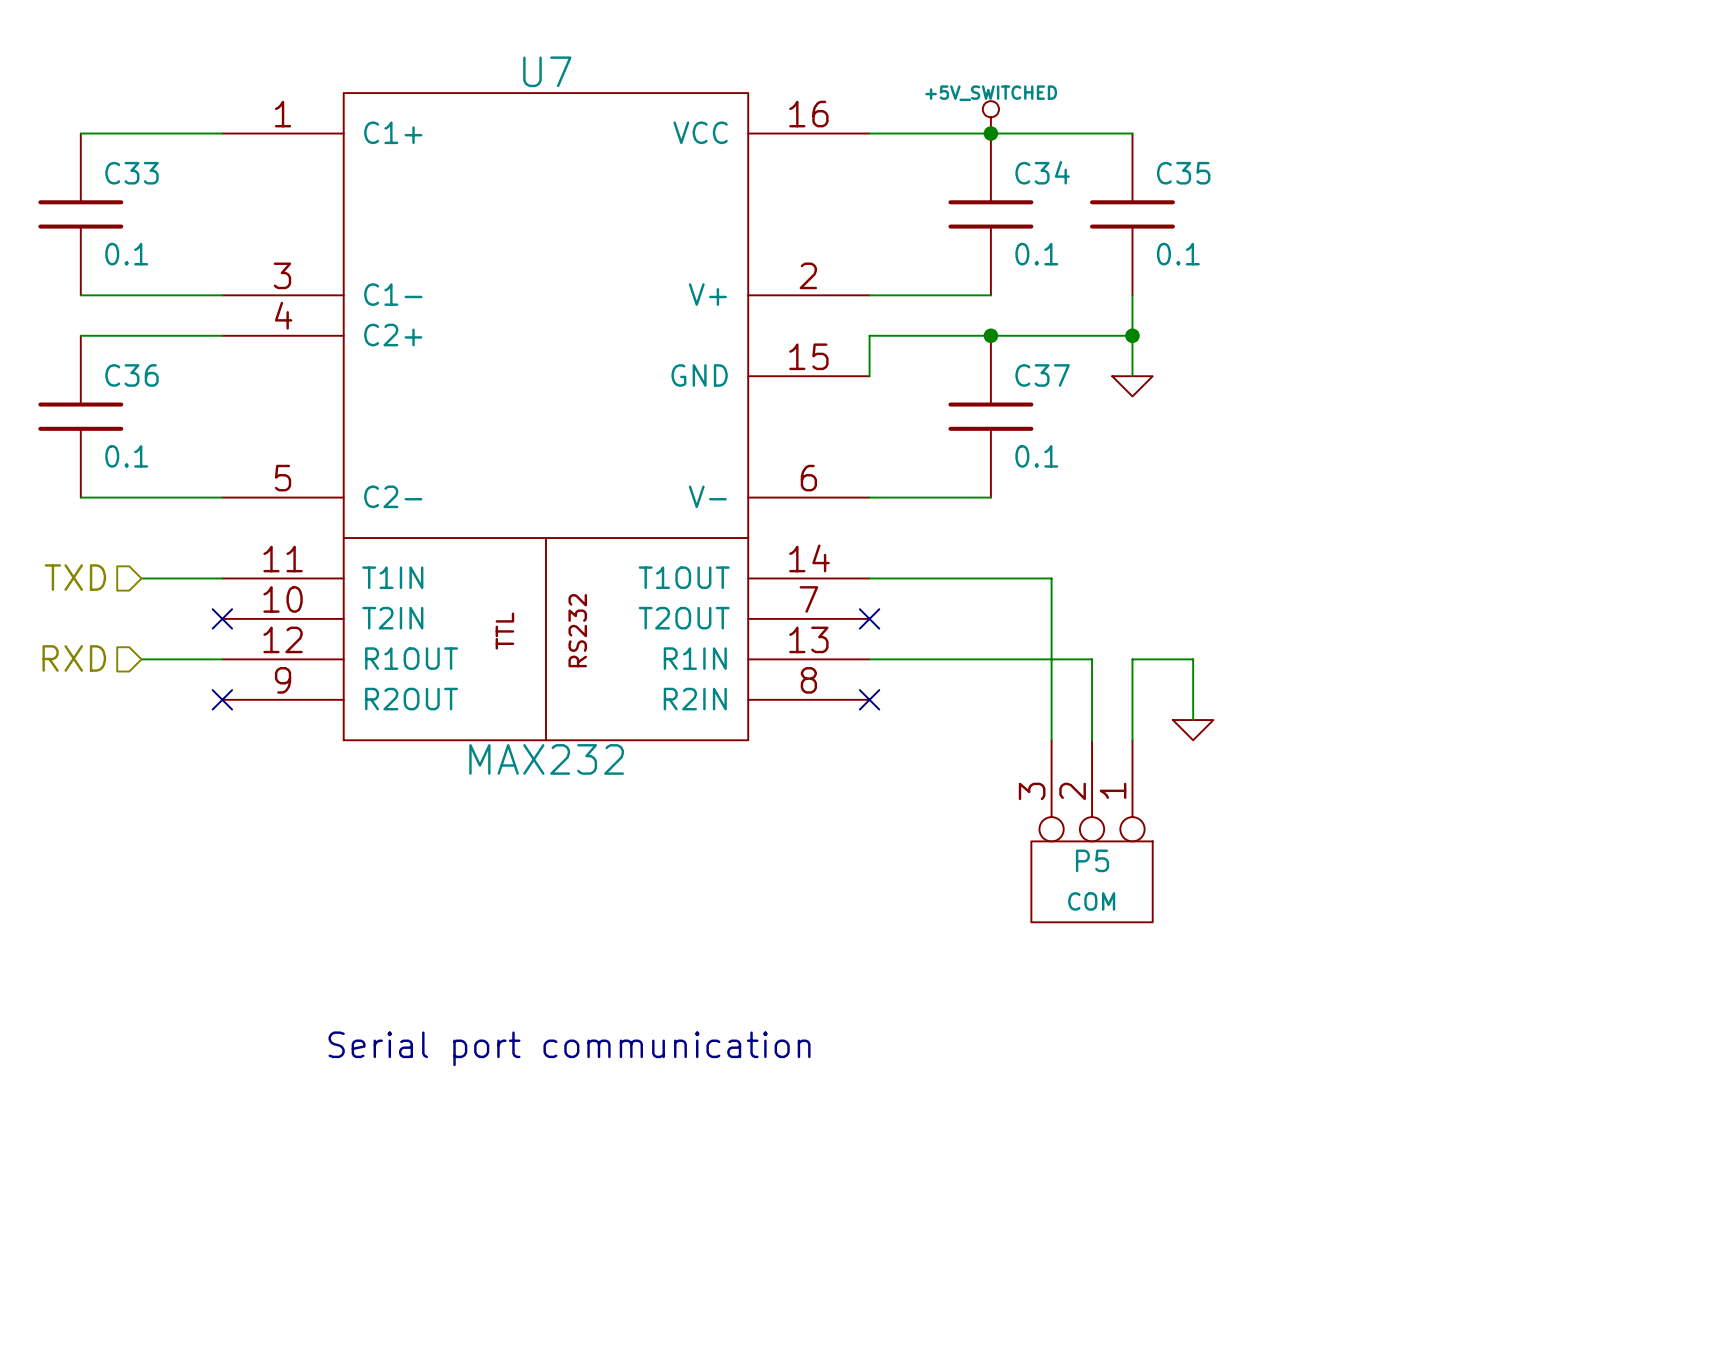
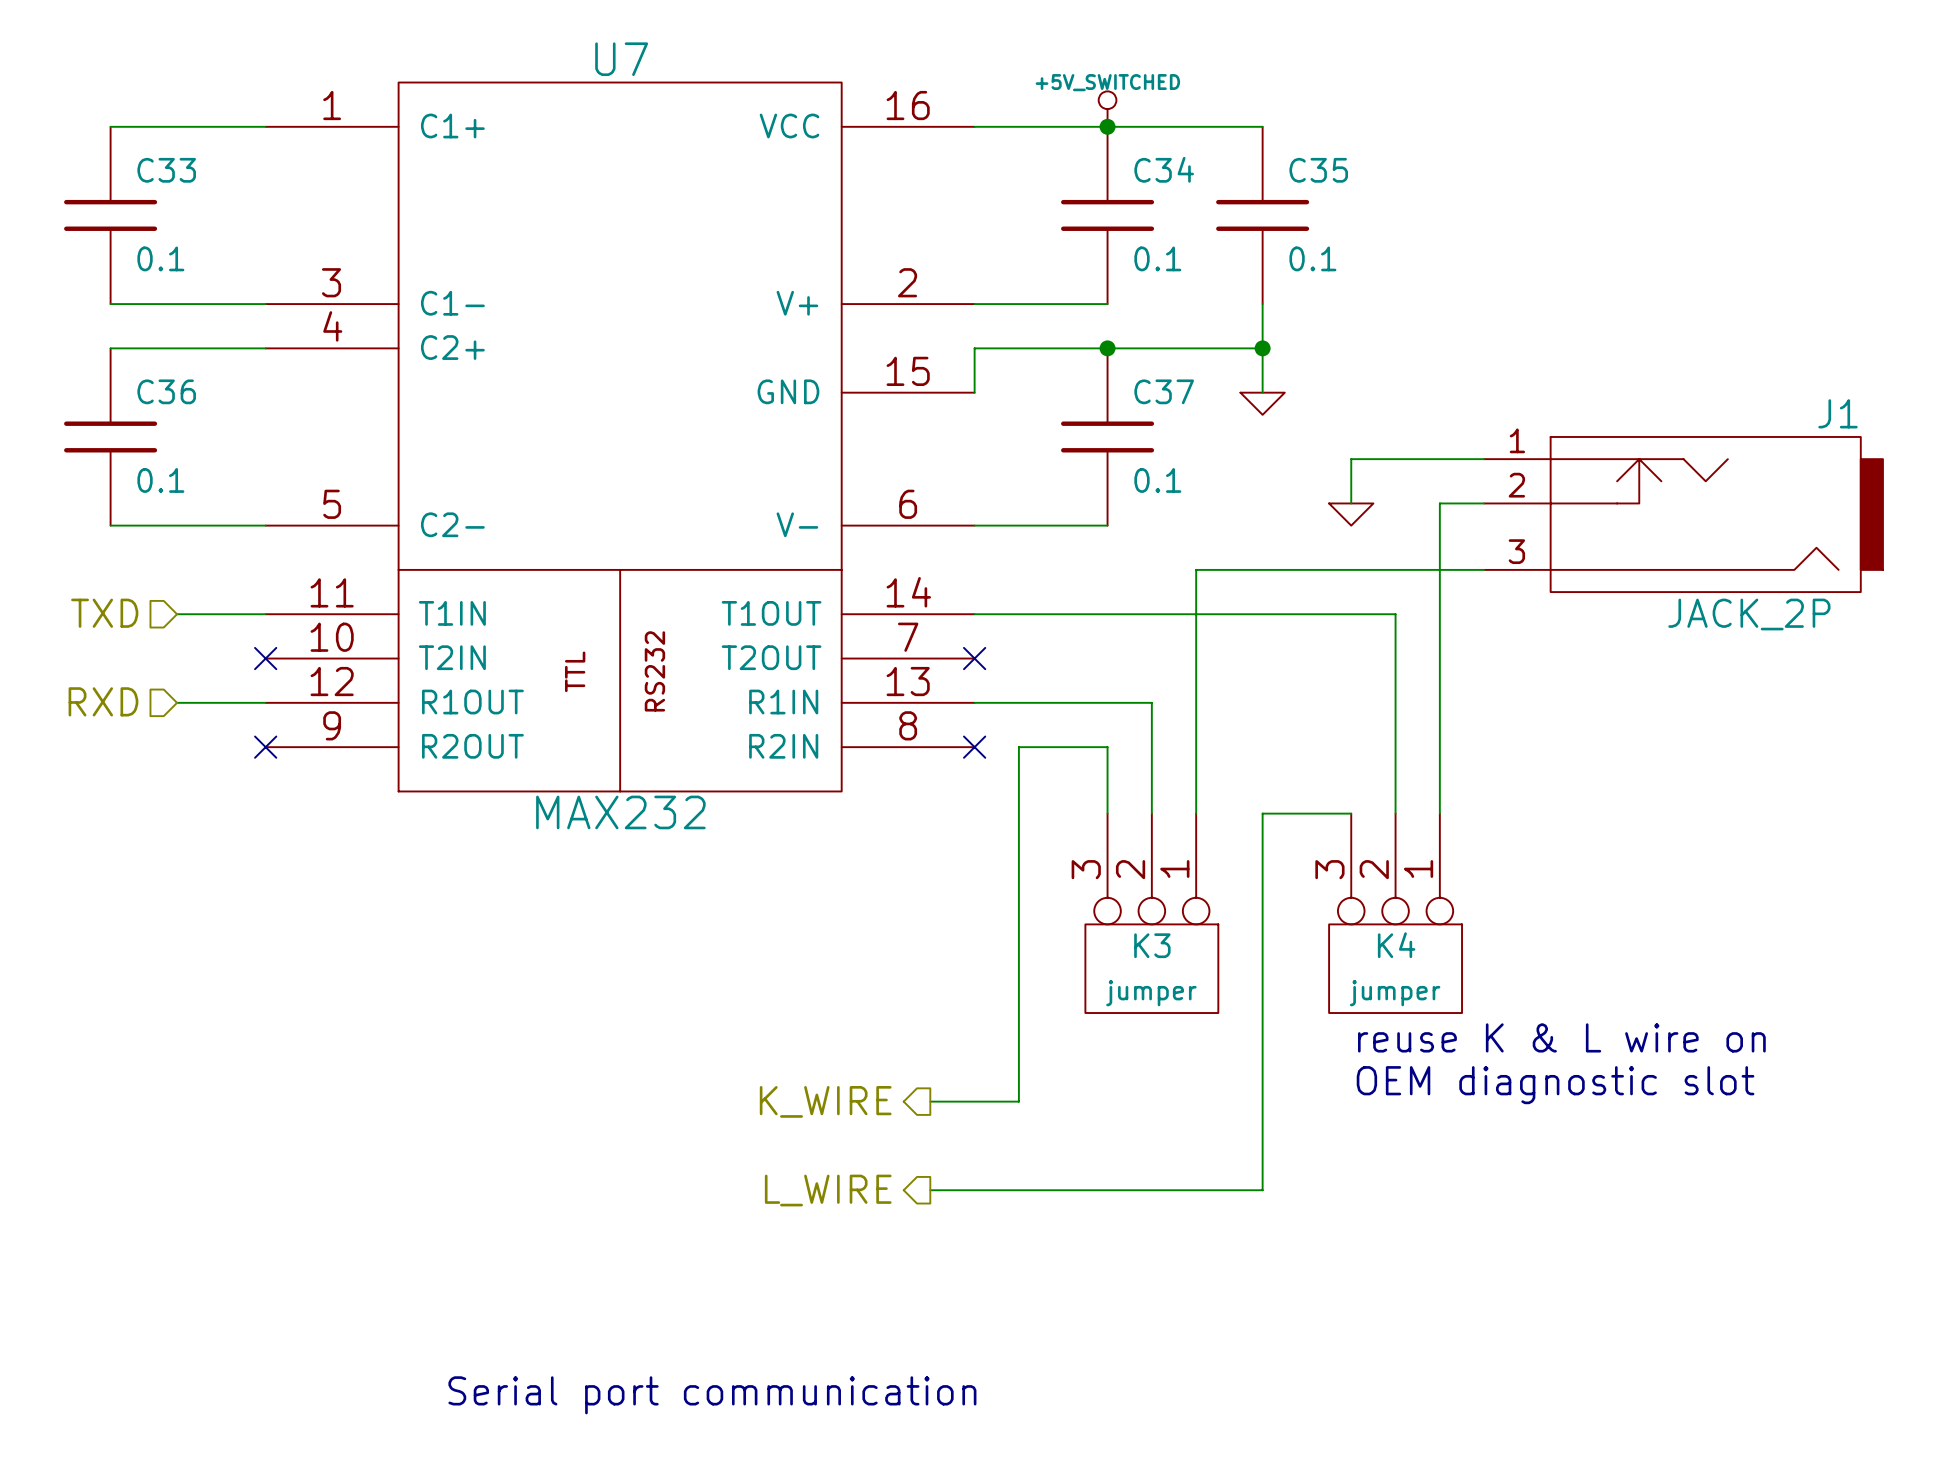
wire: none -> (1484, 459) (1351, 459) (1351, 503)
wire: none -> (1484, 503) (1439, 503) (1439, 813)
J1: none -> JACK_2P (1683, 514)
wire: none -> (1484, 569) (1196, 569) (1196, 813)
wire: (1051, 578) (1051, 740) -> (1174, 614) (1395, 614) (1395, 813)
wire: (1031, 659) (1092, 659) (1092, 740) -> (1151, 702) (1151, 813)
wire: (1193, 720) (1193, 659) (1132, 659) (1132, 740) -> none
power symbol position: (1193, 730) -> (1351, 514)
wire: none -> (1107, 813) (1107, 747) (1018, 747) (1018, 1101) (930, 1101)
wire: none -> (1351, 813) (1262, 813) (1262, 1190) (930, 1190)
P5: COM (1092, 831) -> none
K3: none -> jumper (1151, 913)
K4: none -> jumper (1395, 913)
text: none -> reuse K & L wire on (1561, 1037)
text: none -> OEM diagnostic slot (1555, 1085)
hierarchical label: none -> K_WIRE (825, 1101)
text position: Serial port communication (569, 1048) -> Serial port communication (712, 1395)
hierarchical label: none -> L_WIRE (828, 1190)

